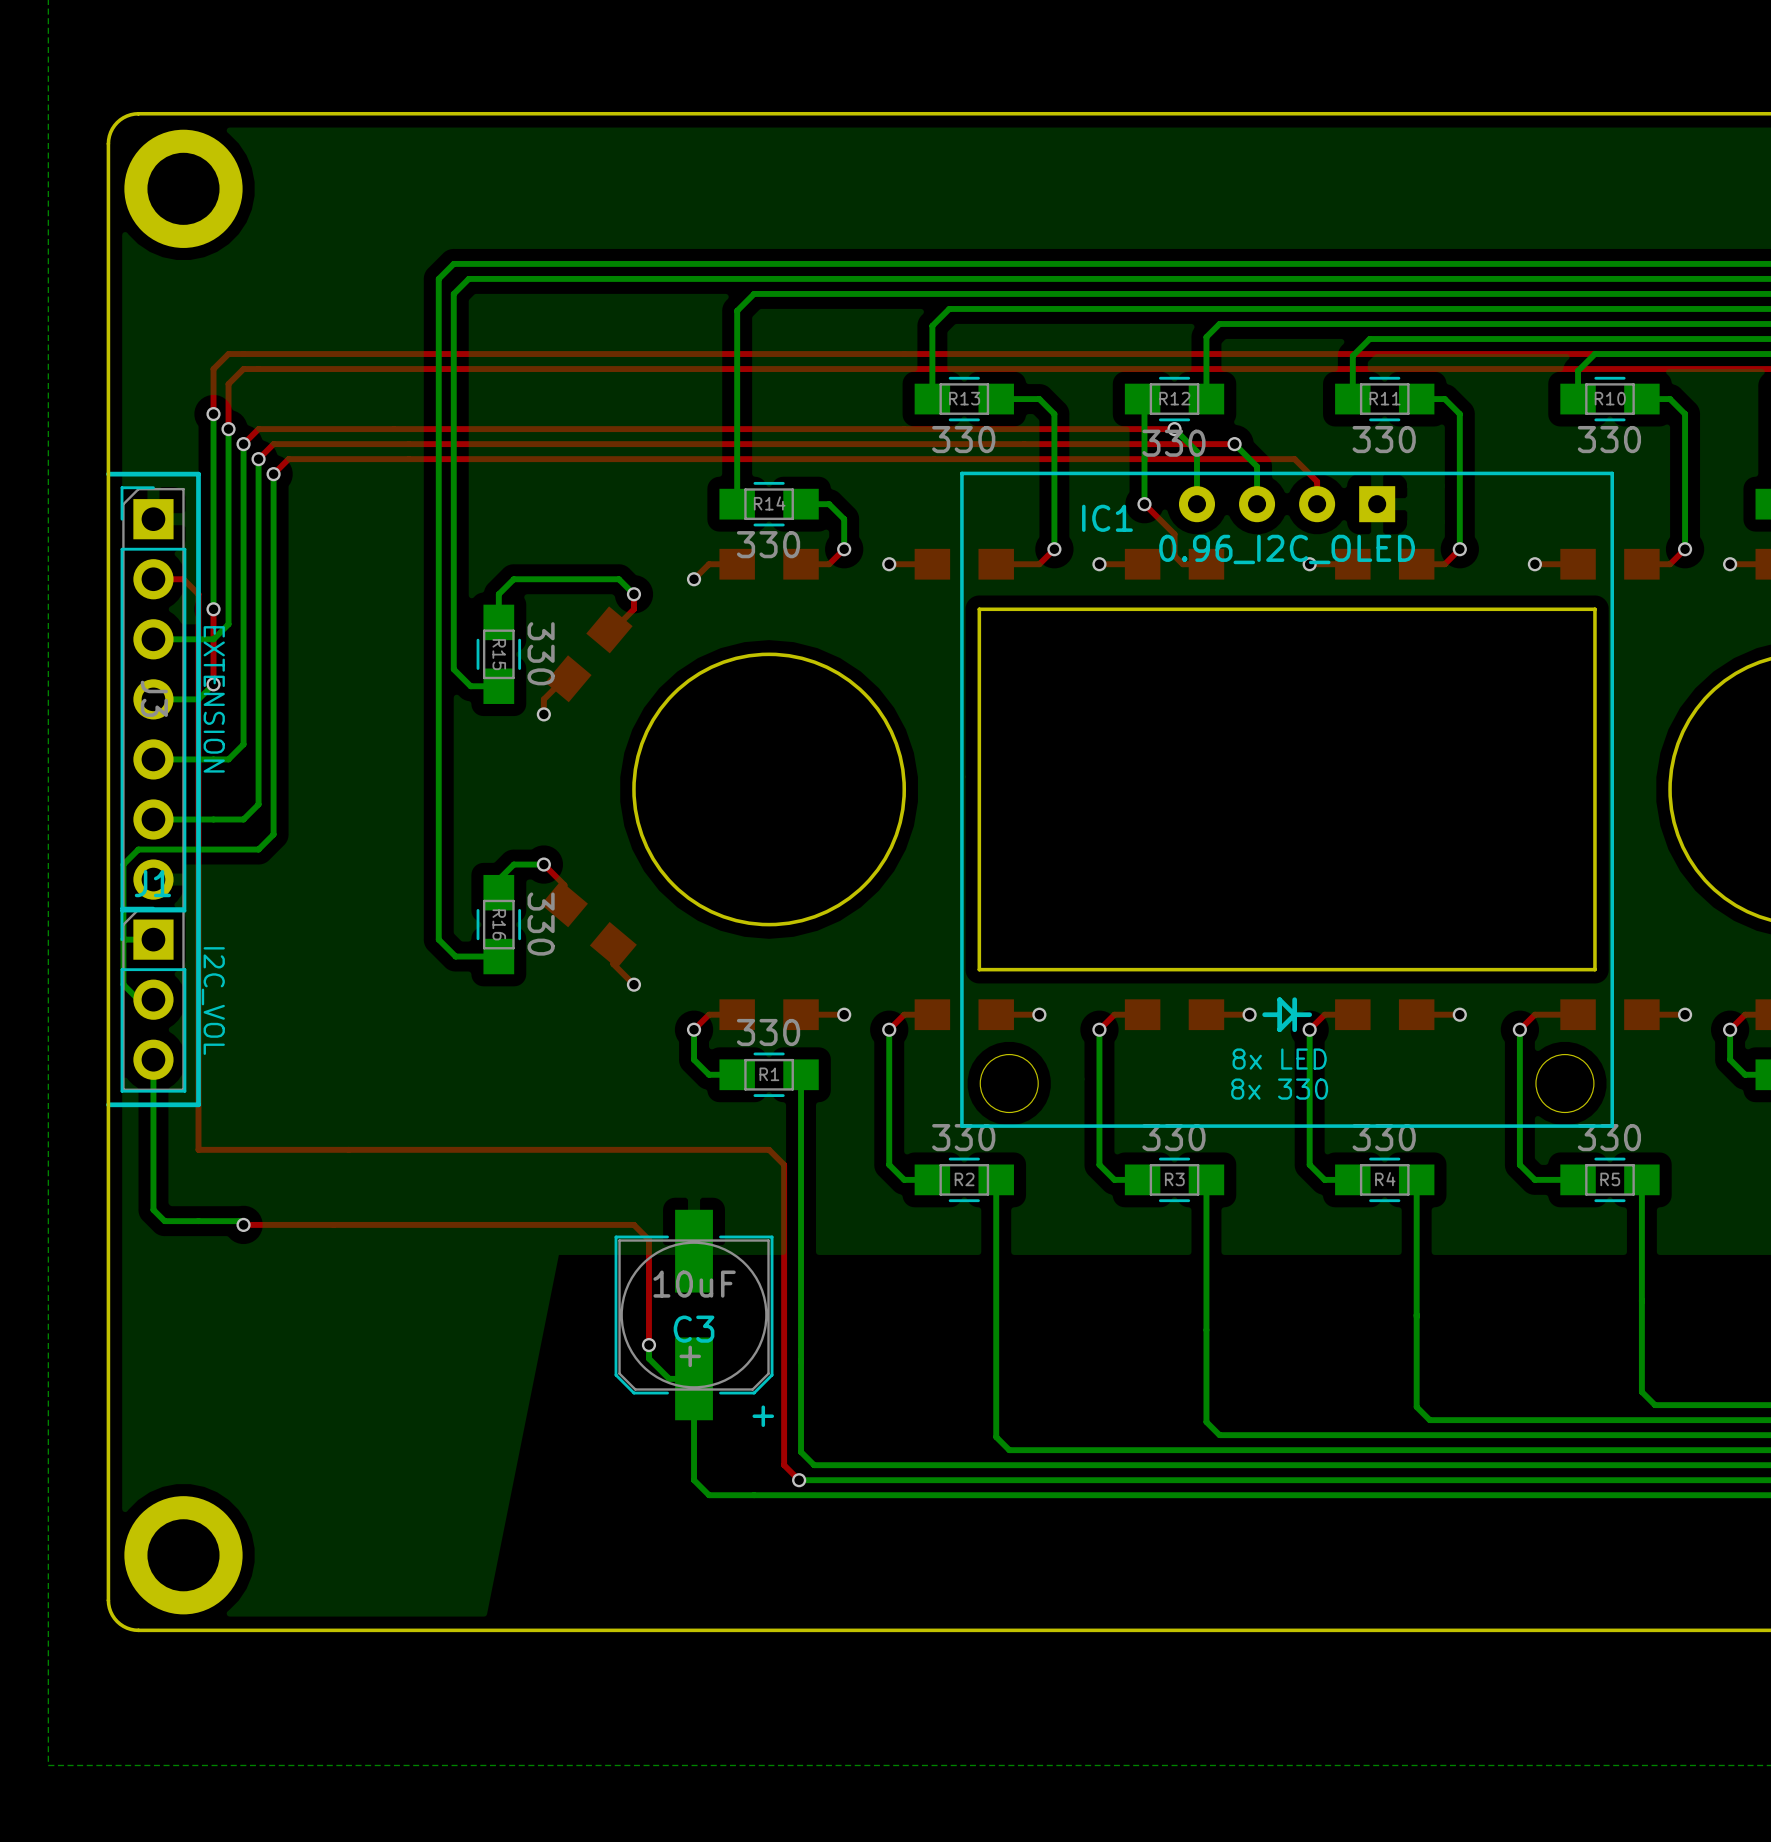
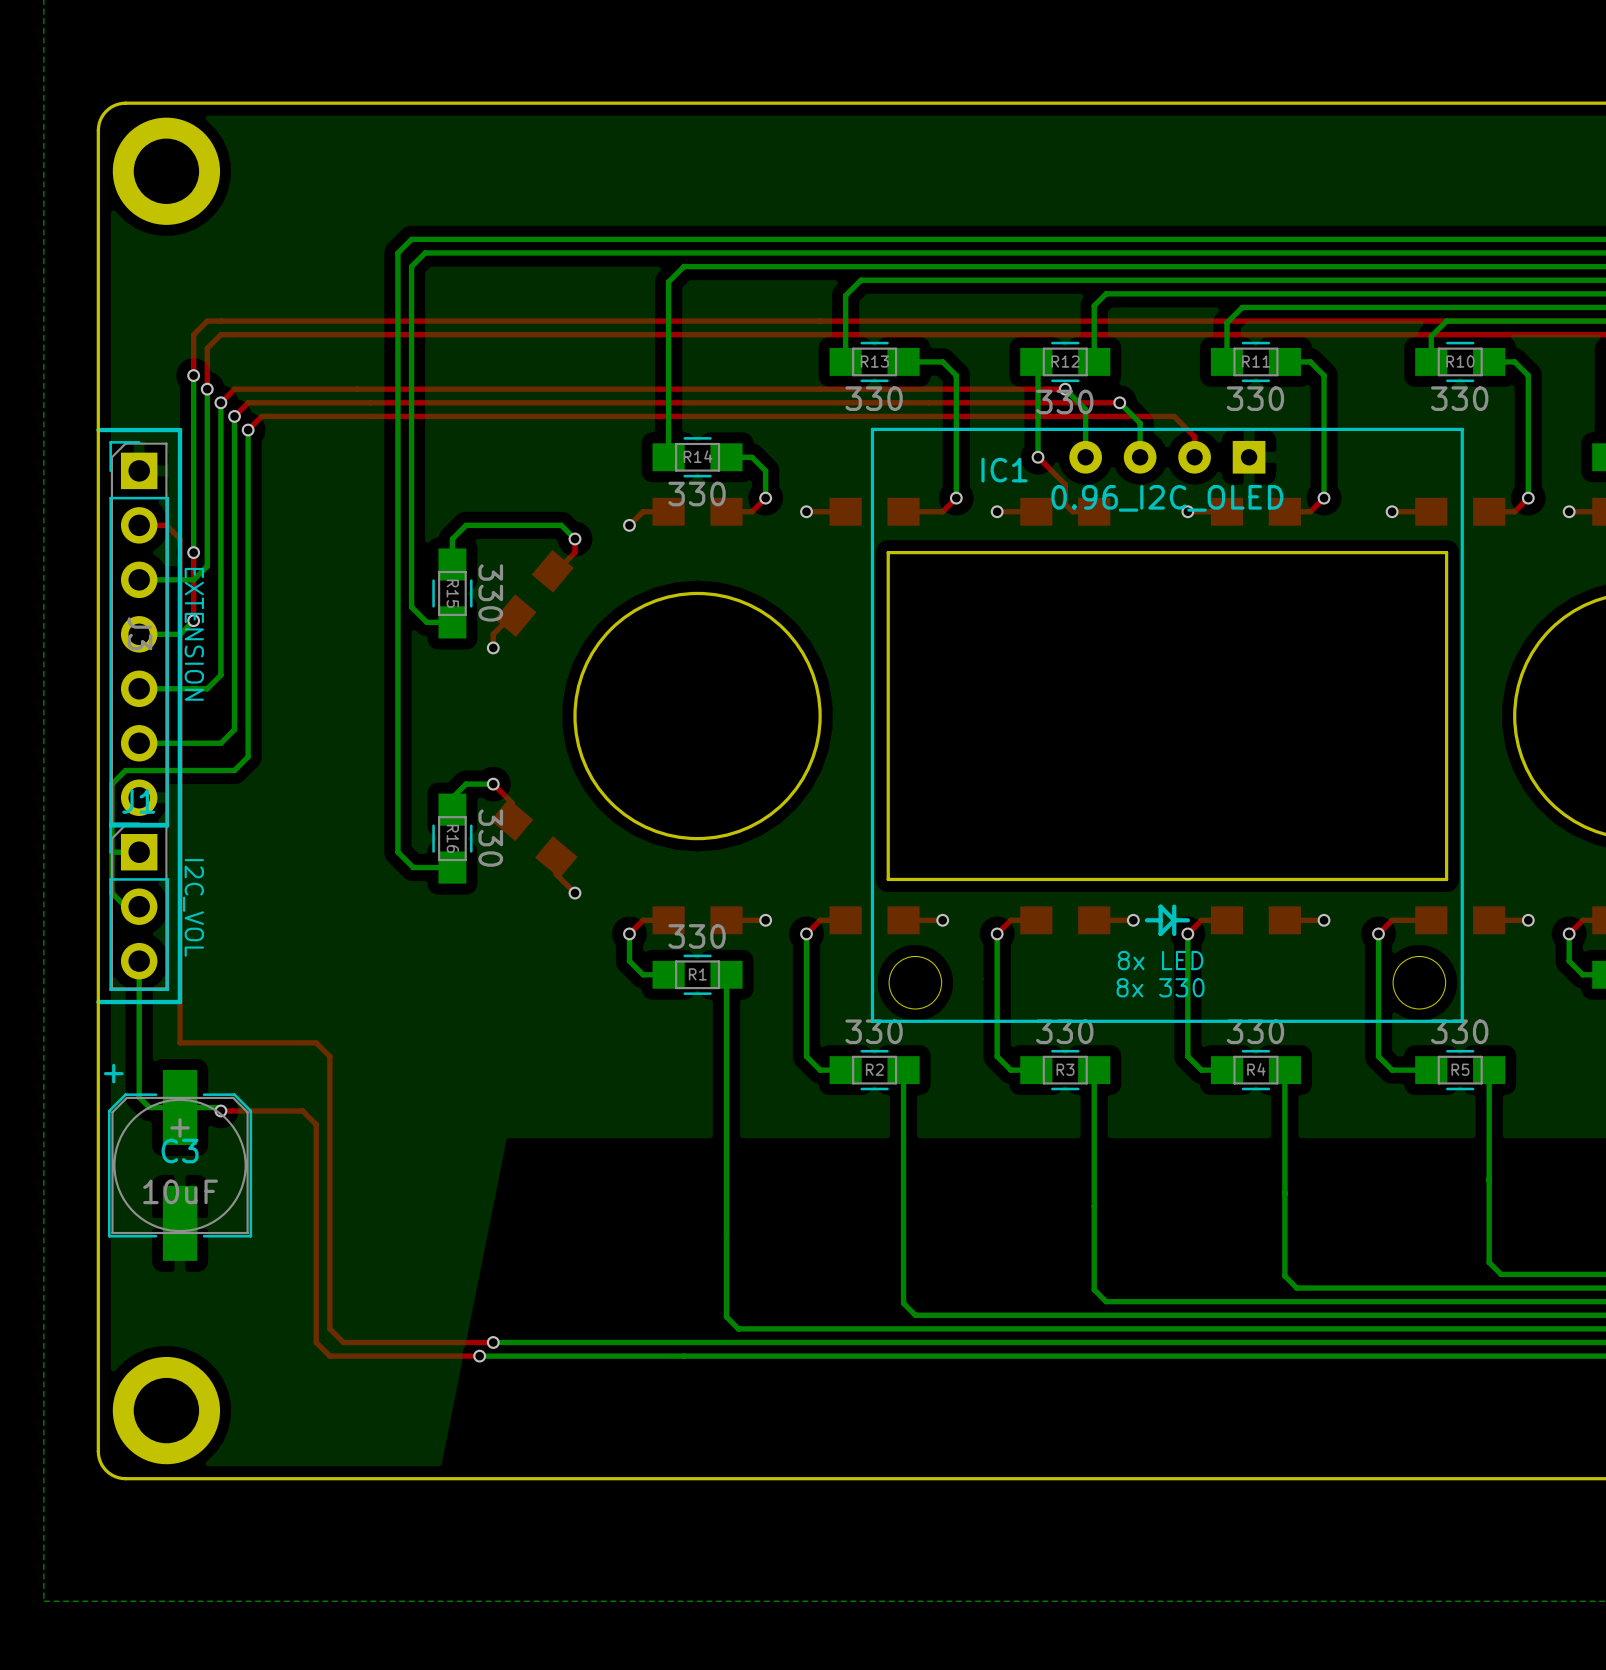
top track: (348, 1149) (769, 1149) (784, 1164) (784, 1465) (799, 1480) -> (316, 1042) (329, 1056) (329, 1328) (343, 1342) (493, 1342)
top track: (333, 1224) (633, 1224) (648, 1239) (648, 1345) -> (302, 1110) (316, 1124) (316, 1342) (329, 1356) (479, 1356)
C3 rotation: 0° (694, 1315) -> 180° (180, 1165)
C3 position: (694, 1315) -> (180, 1165)
bottom track: (648, 1345) (648, 1358) (669, 1378) (694, 1378) (694, 1480) (709, 1495) -> (479, 1356) (643, 1356)
via: (648, 1345) -> none
via: none -> (493, 1342)
bottom track: none -> (724, 1342) (493, 1342)
via: (799, 1480) -> none
via: none -> (479, 1356)

